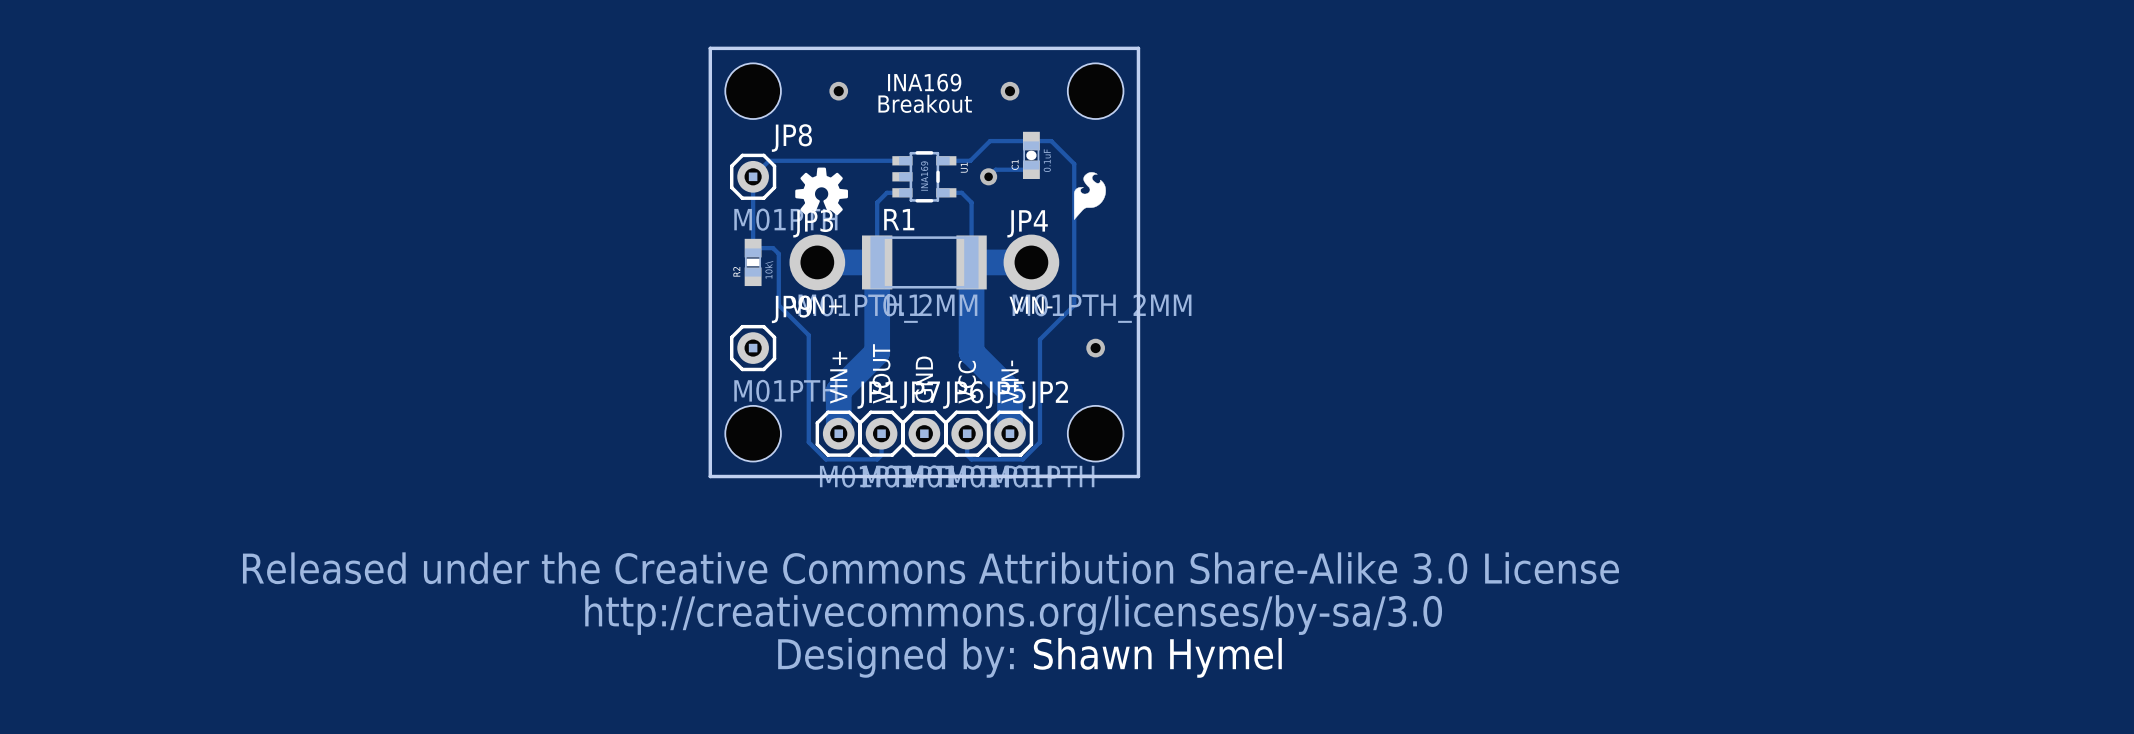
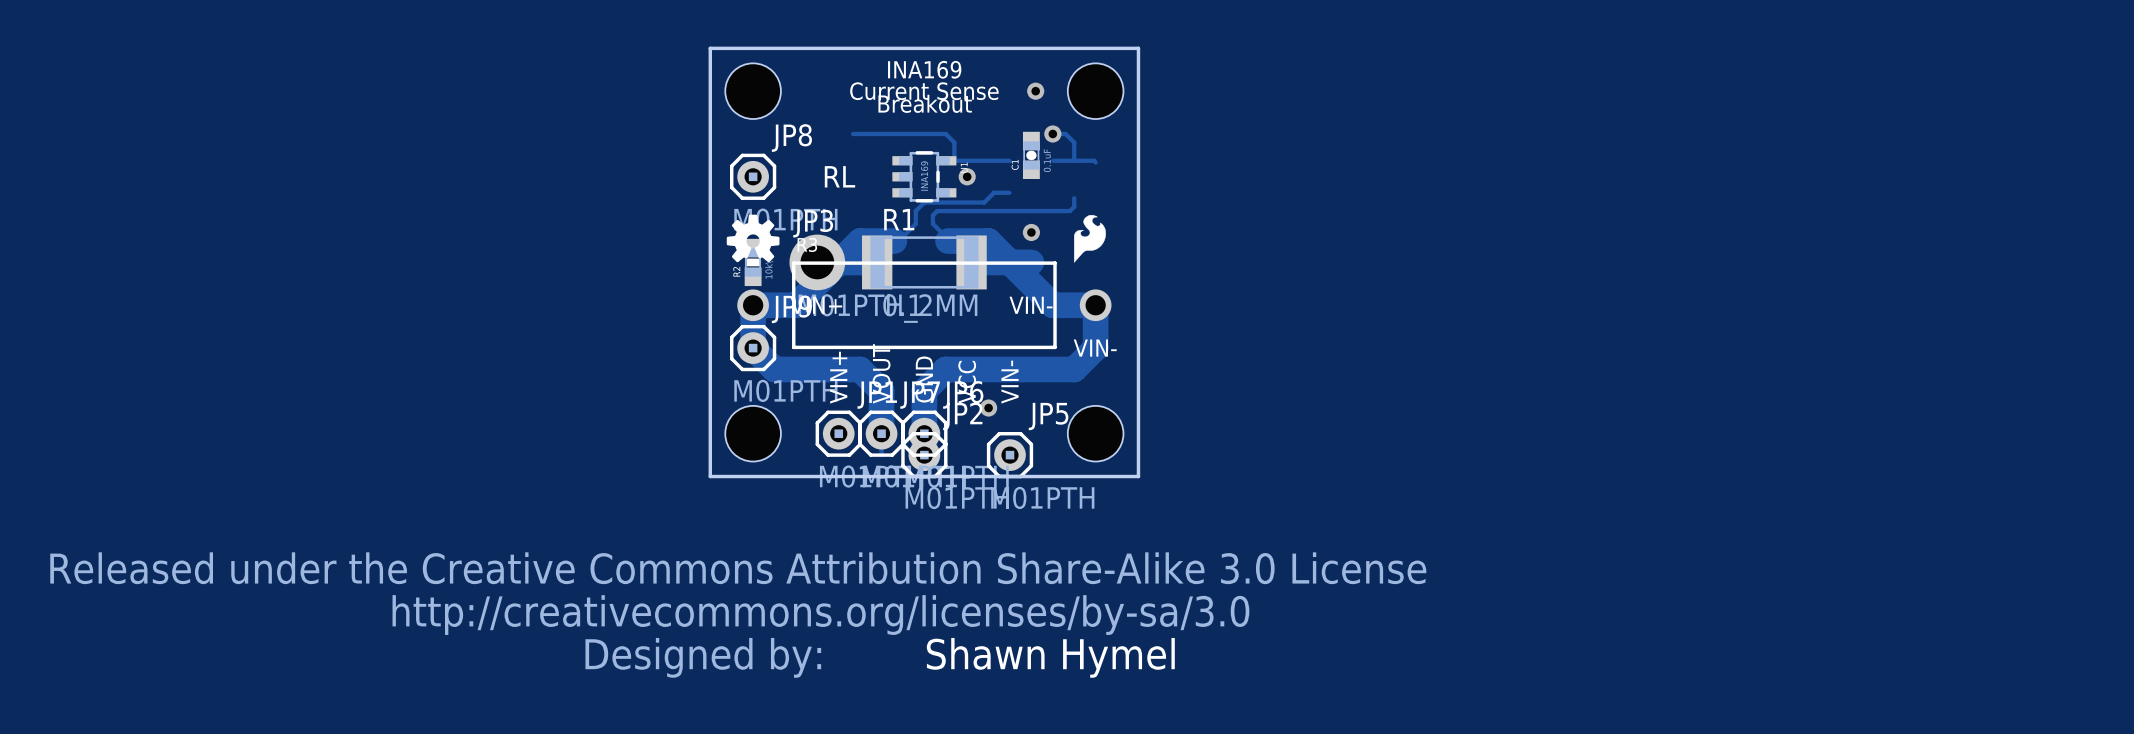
text: none -> INA169 (924, 69)
text: INA169 (924, 82) -> Current Sense (924, 91)
via: (838, 91) -> none
via: (1010, 91) -> none
via: none -> (1035, 91)
track: none -> (853, 133) (945, 133) (954, 142) (954, 160)
track: none -> (1052, 133) (1065, 133) (1074, 142) (1074, 160)
via: none -> (1052, 133)
track: (902, 160) (769, 160) (753, 176) (753, 248) (773, 248) (778, 253) (778, 305) (808, 335) (808, 442) (825, 459) (877, 459) (881, 455) -> none
track: (970, 160) (990, 141) (1051, 141) (1074, 163) (1074, 198) -> (970, 160) (1009, 160)
track: none -> (1053, 160) (1093, 160) (1095, 162)
track: (1031, 169) (995, 169) (988, 176) -> none
text: none -> RL (839, 176)
via position: (988, 176) -> (967, 176)
drawing position: (821, 191) -> (753, 238)
track: (902, 192) (886, 192) (877, 202) (877, 352) (838, 390) (838, 433) -> none
track: (946, 192) (961, 192) (971, 202) (971, 352) (1010, 390) (1010, 433) -> none
track: none -> (1009, 192) (993, 192) (984, 202) (924, 202) (915, 211) (915, 223) (900, 241) (860, 241) (795, 305) (753, 305) (753, 348) (774, 369) (860, 369) (881, 390) (881, 433)
drawing position: (1089, 195) -> (1089, 238)
track: (1074, 206) (1074, 305) (1039, 339) (1039, 442) (1022, 459) (971, 459) (967, 455) (967, 433) -> (1074, 206) (1069, 211) (937, 211) (932, 215) (932, 223) (947, 241) (988, 241) (1052, 305) (1095, 305) (1095, 348) (1074, 369) (945, 369) (924, 390) (924, 455)
via: none -> (1031, 232)
JP4: M01PTH_2MM (1031, 262) -> none
part: none -> (924, 305)
text: none -> VIN- (1095, 348)
via: (1095, 348) -> none
via: none -> (988, 408)
JP5 position: (967, 433) -> (1010, 455)
JP2 position: (1010, 433) -> (924, 455)
drawing position: (930, 615) -> (738, 615)
text position: Shawn Hymel (1157, 657) -> Shawn Hymel (1050, 657)

